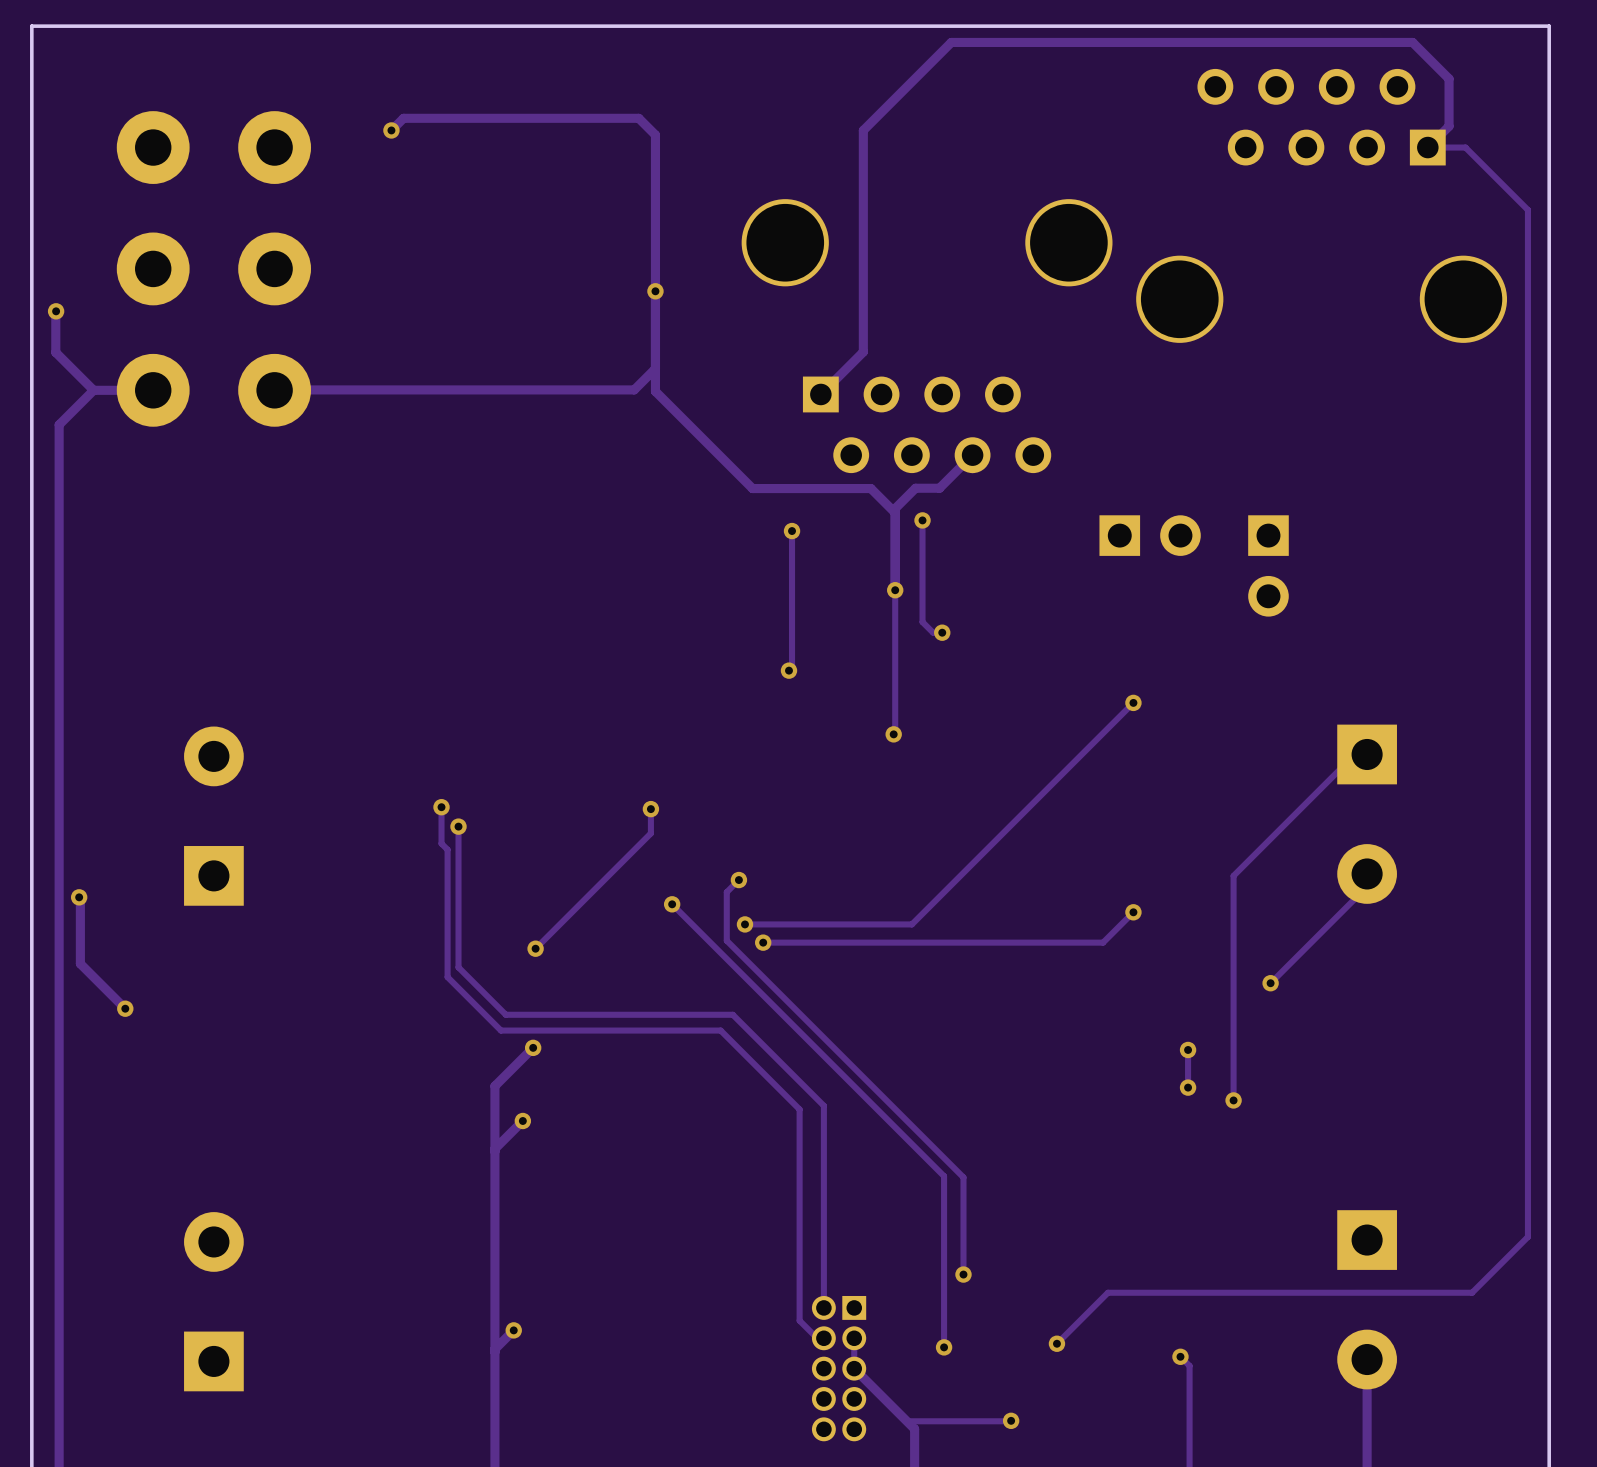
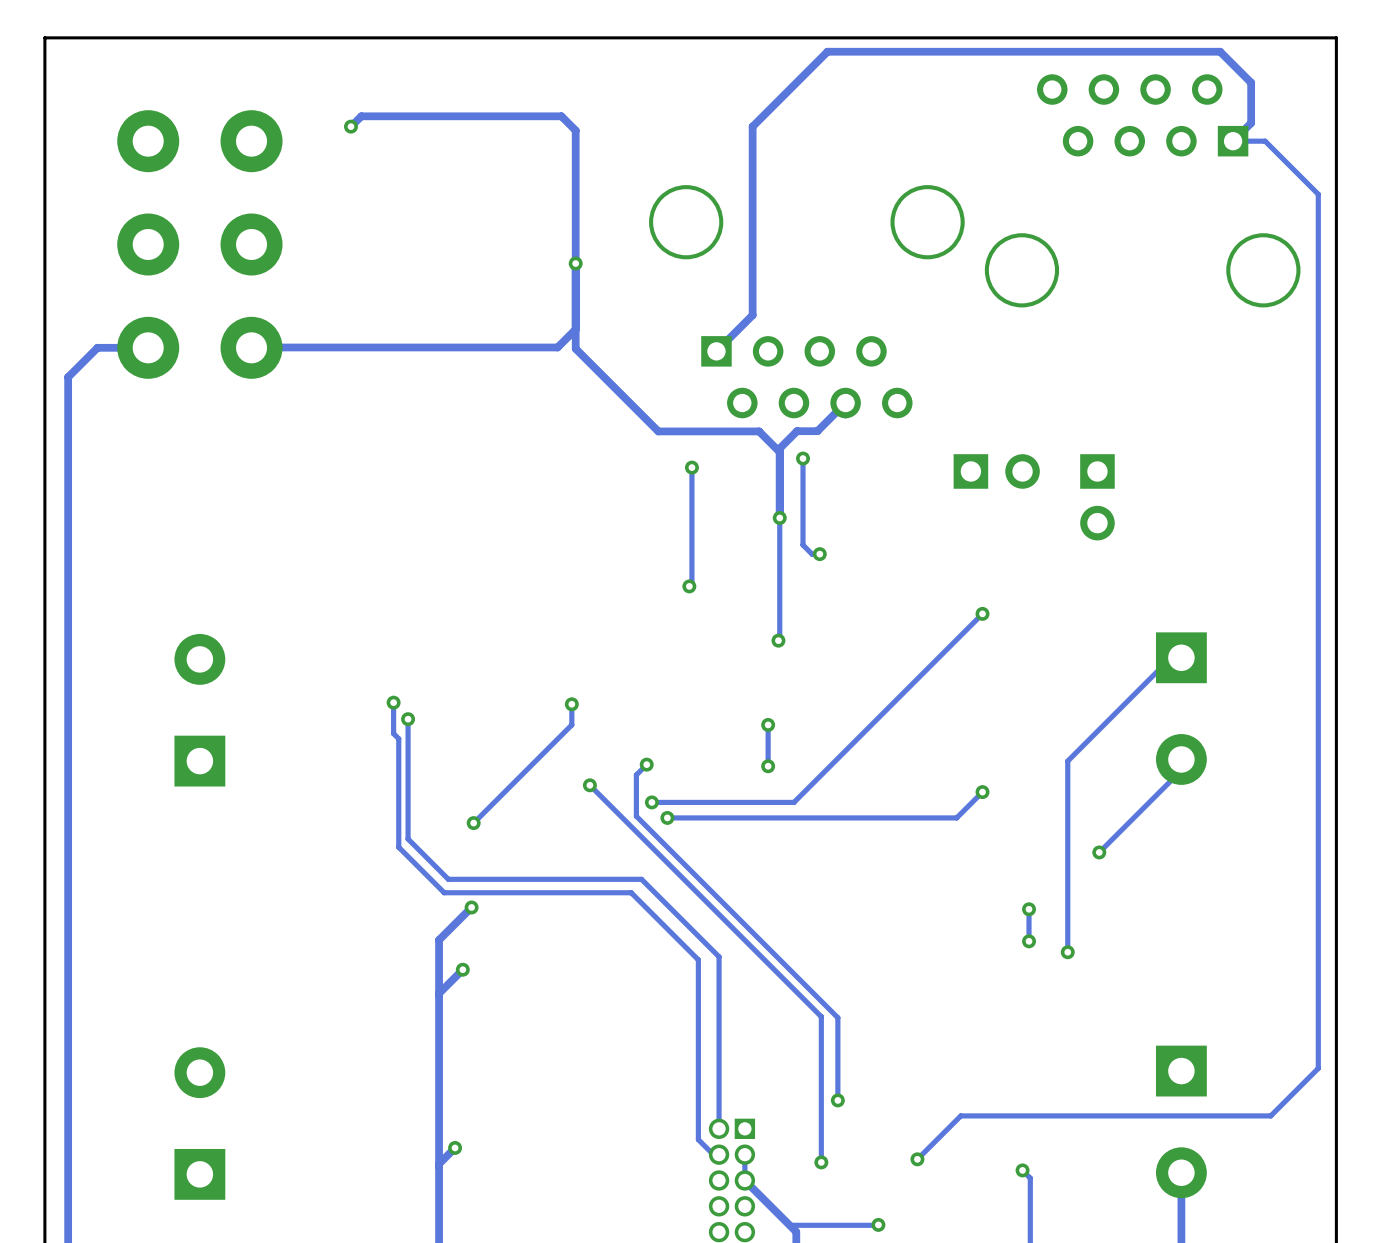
track: (55, 311) (55, 352) (93, 390) -> none
via: (56, 311) -> none
track: none -> (768, 724) (768, 766)
via: none -> (768, 724)
via: none -> (768, 766)
track: (79, 897) (80, 963) (125, 1008) -> none
via: (79, 897) -> none
via: (125, 1008) -> none

